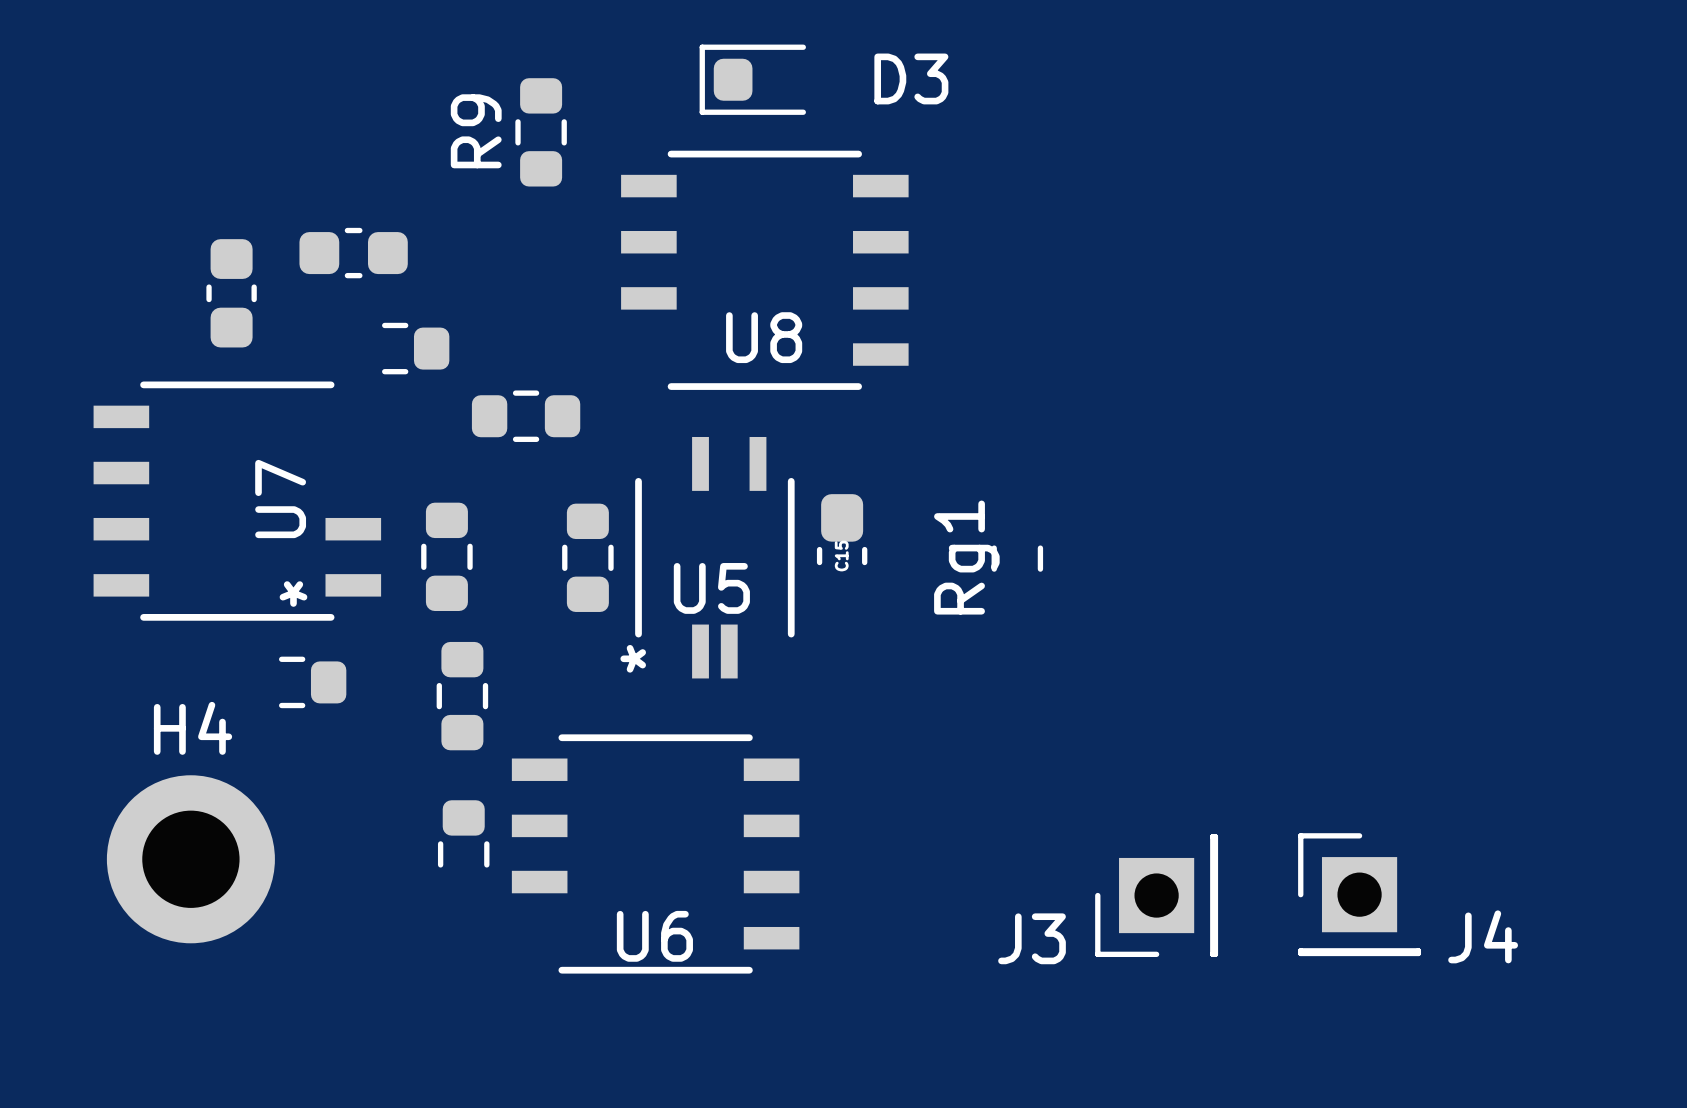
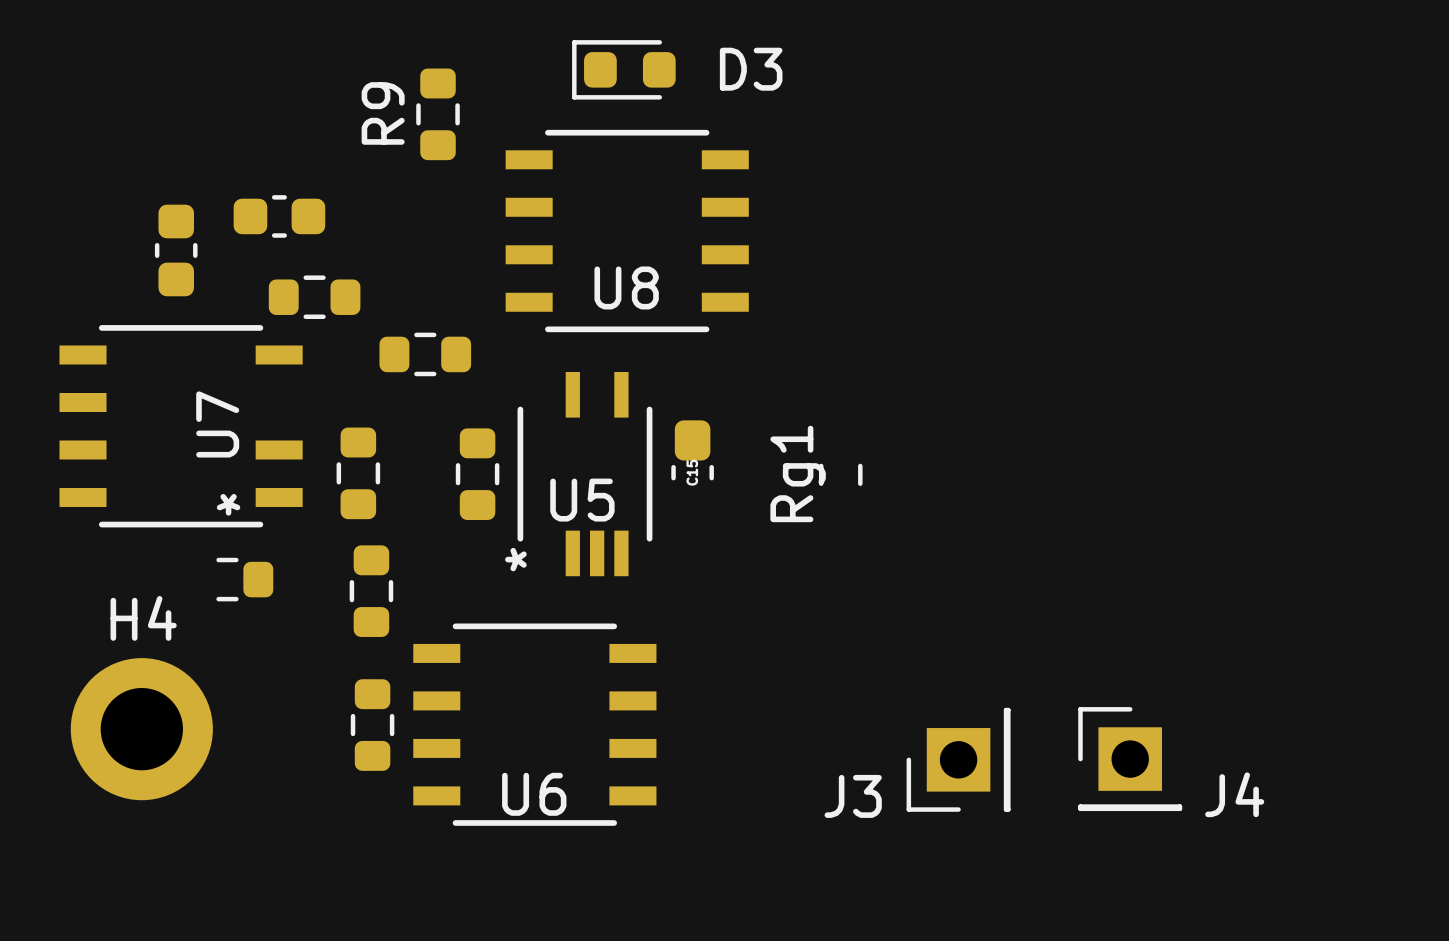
D3 footprint: [699, 44, 806, 115] -> [572, 40, 676, 100]
U8 footprint: [621, 150, 909, 390] -> [505, 129, 749, 333]
part footprint: [382, 322, 450, 375] -> [268, 275, 361, 320]
U7 footprint: [93, 381, 382, 621] -> [59, 325, 303, 528]
U5 footprint: [635, 436, 795, 679] -> [517, 372, 653, 577]
U6 footprint: [511, 734, 800, 974] -> [413, 623, 657, 826]
part footprint: [437, 800, 490, 868] -> [350, 679, 395, 771]

